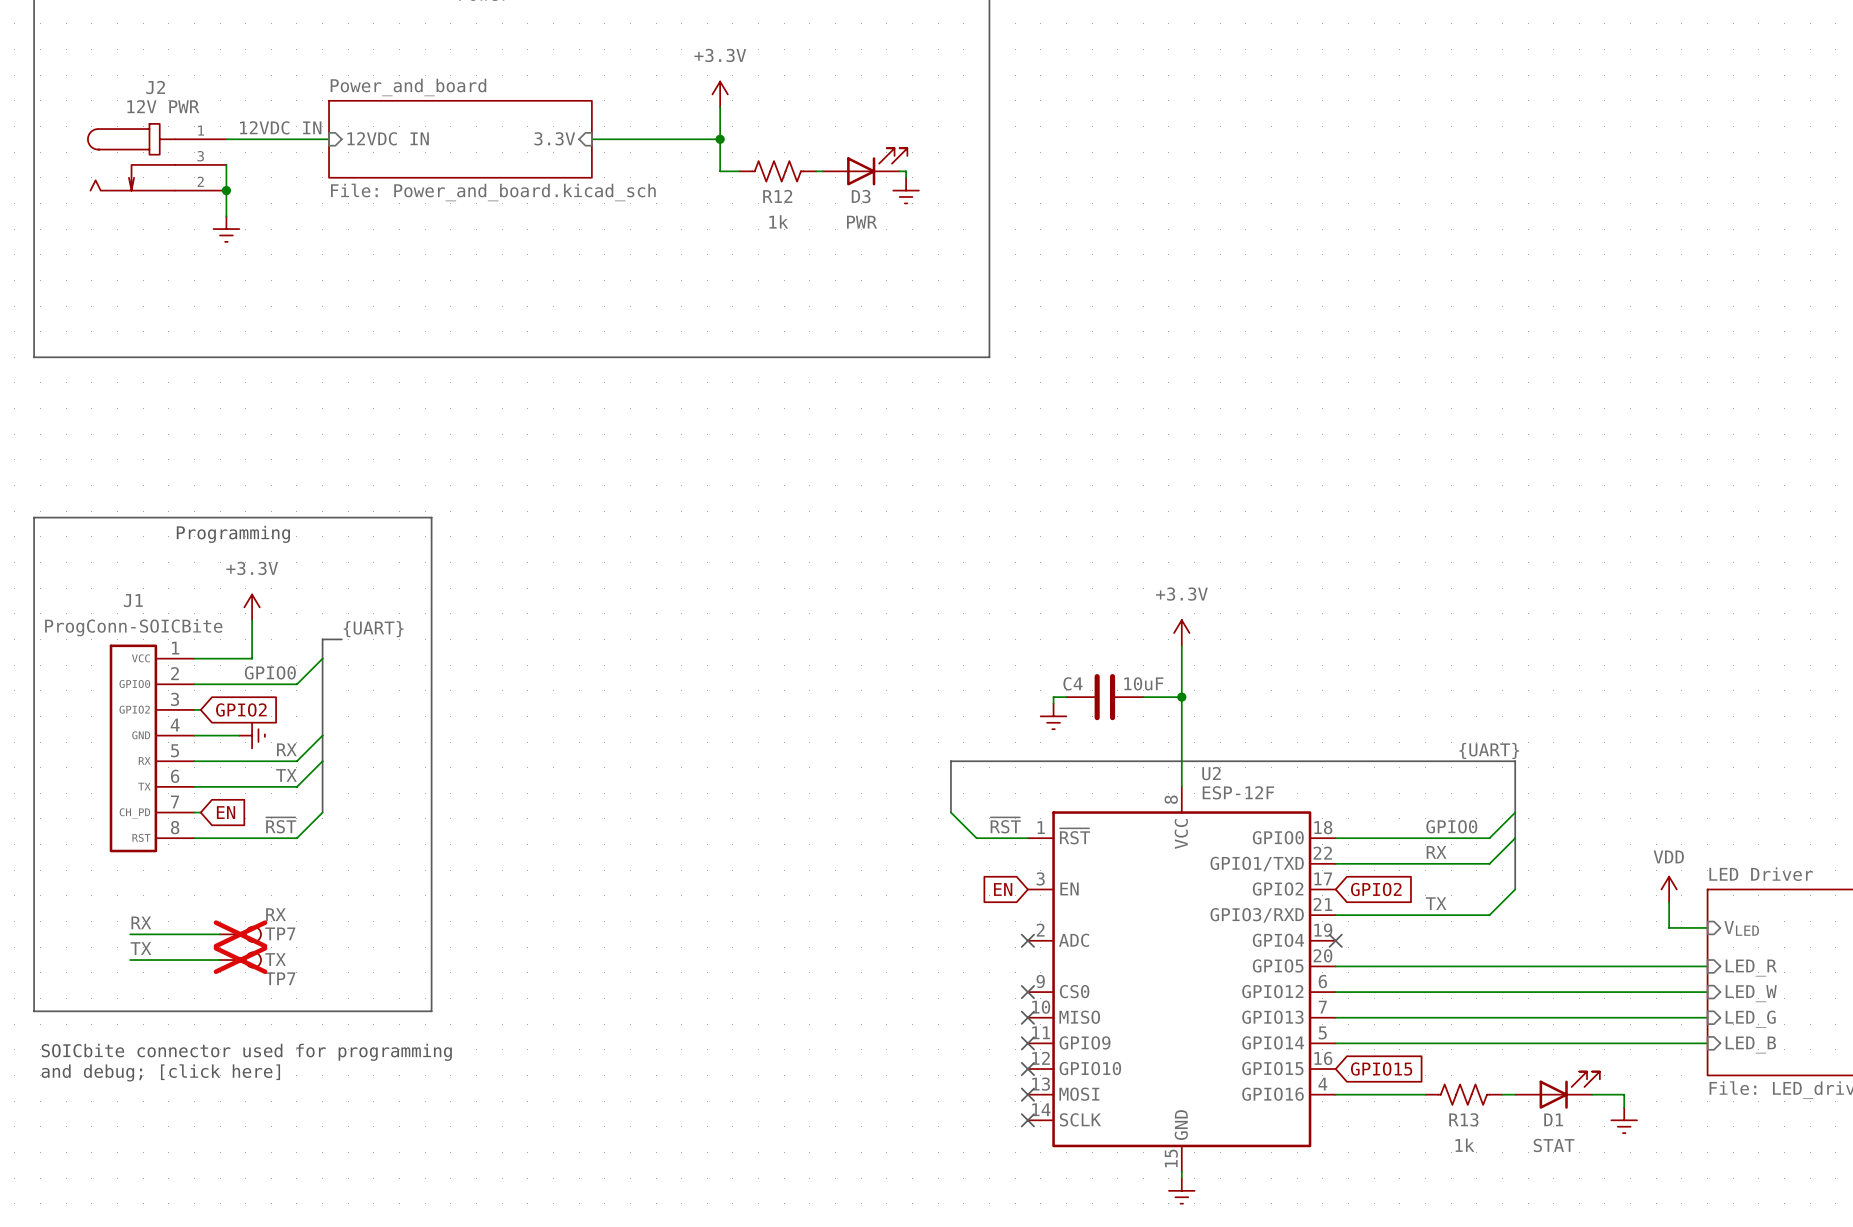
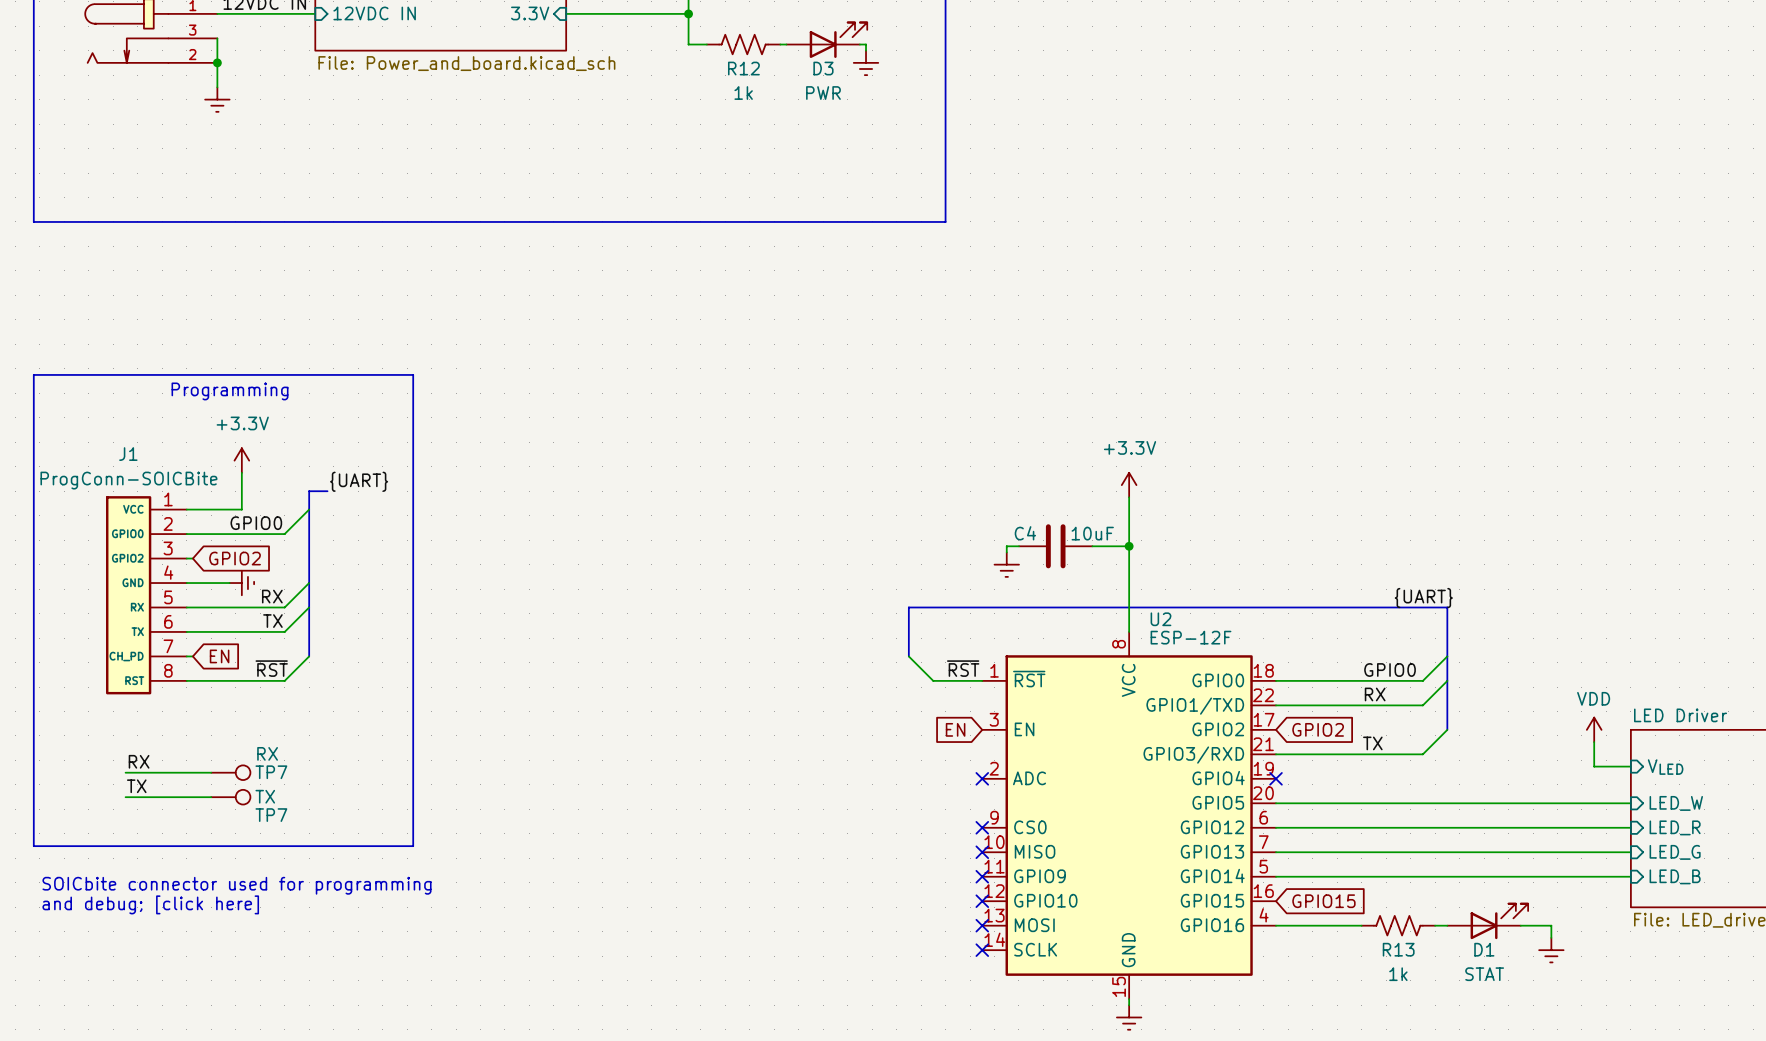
TP7 do-not-place cross: (240, 934) -> none
TP7 do-not-place cross: (240, 960) -> none
sheet pin: LED_R (1751, 968) -> LED_W (1676, 803)
sheet pin: LED_W (1751, 993) -> LED_R (1675, 827)

